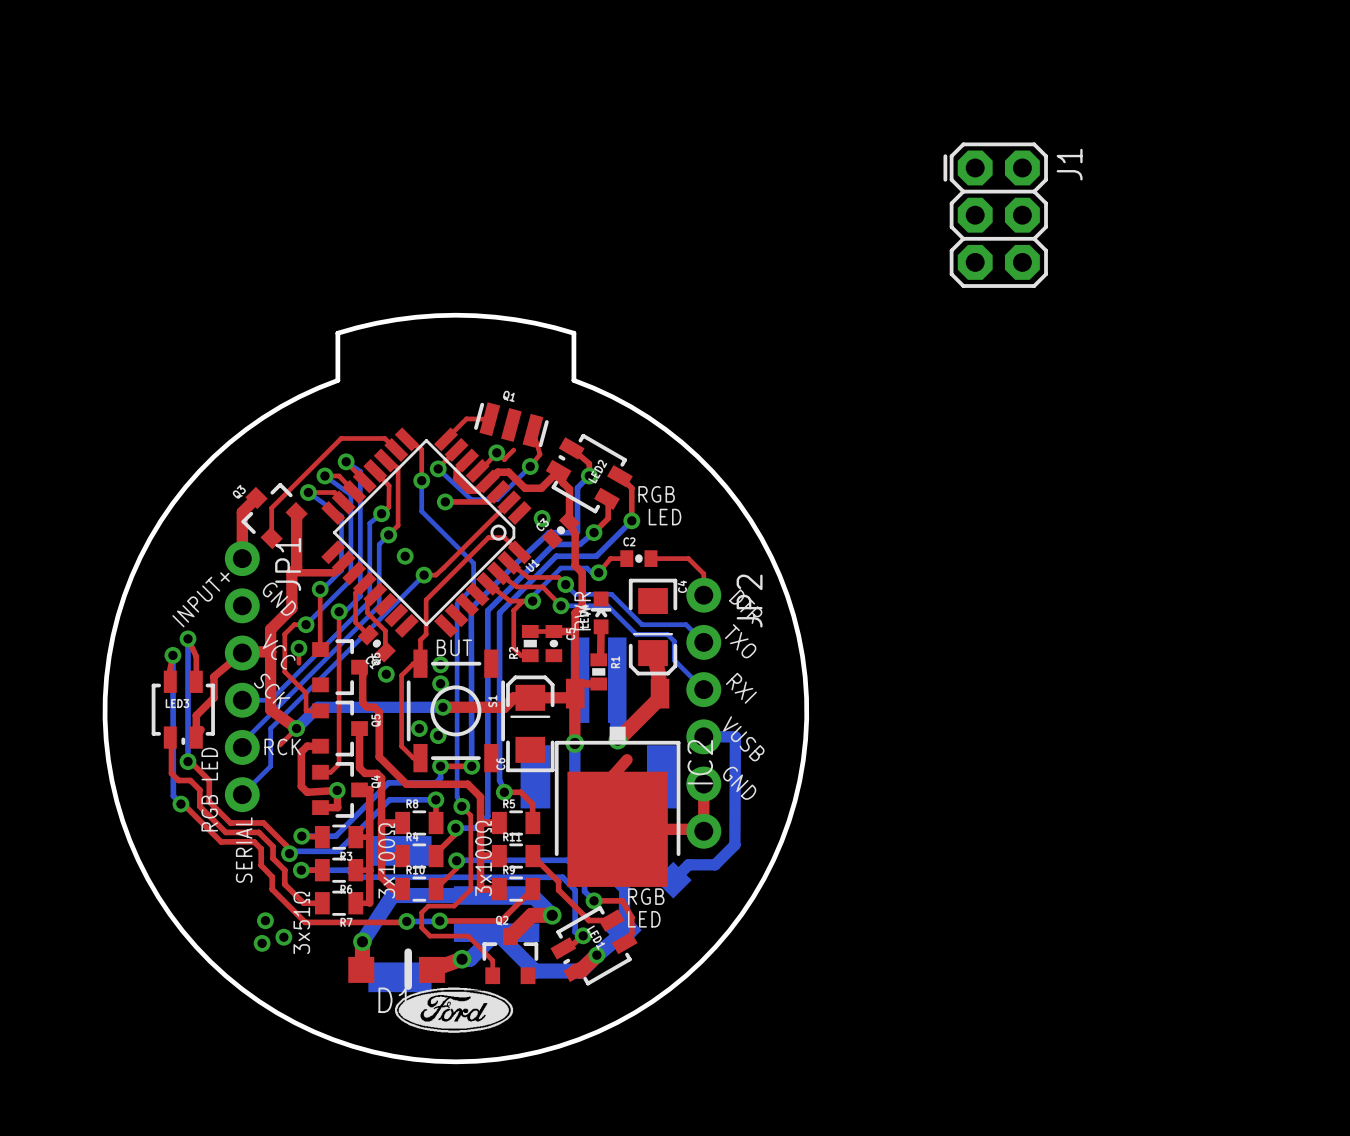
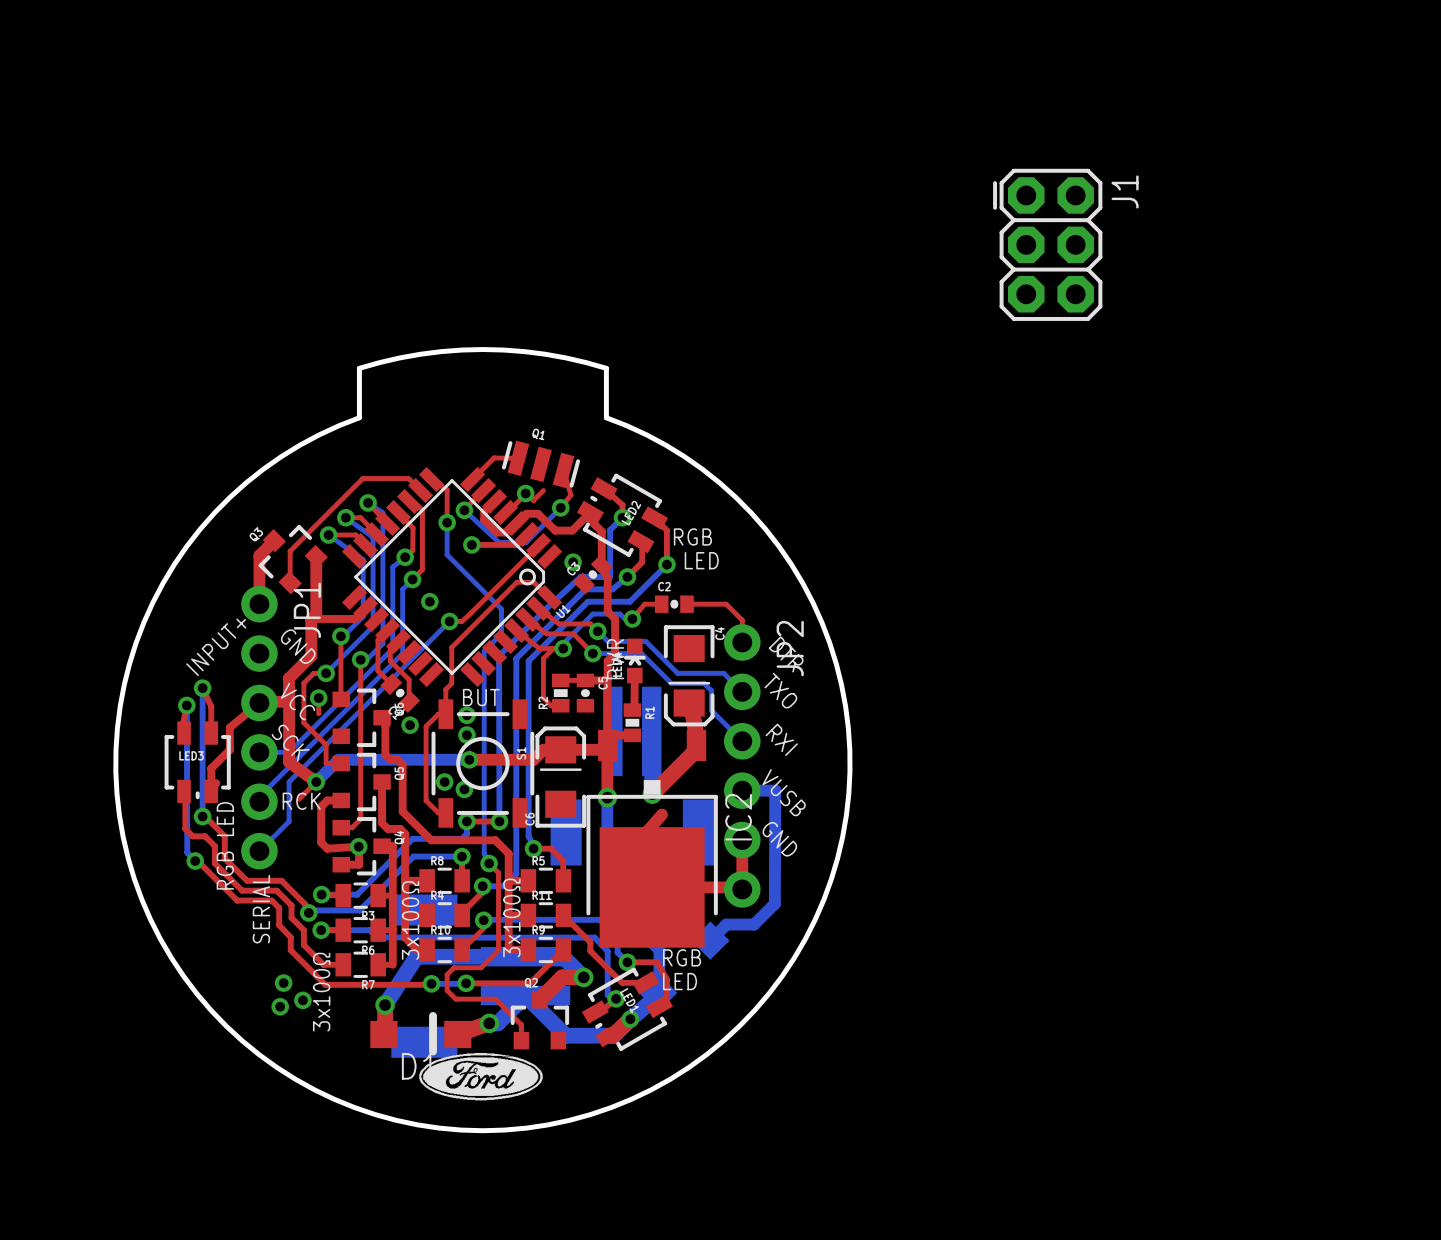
text: 3x51Ω (301, 922) -> 3x100Ω (321, 992)

